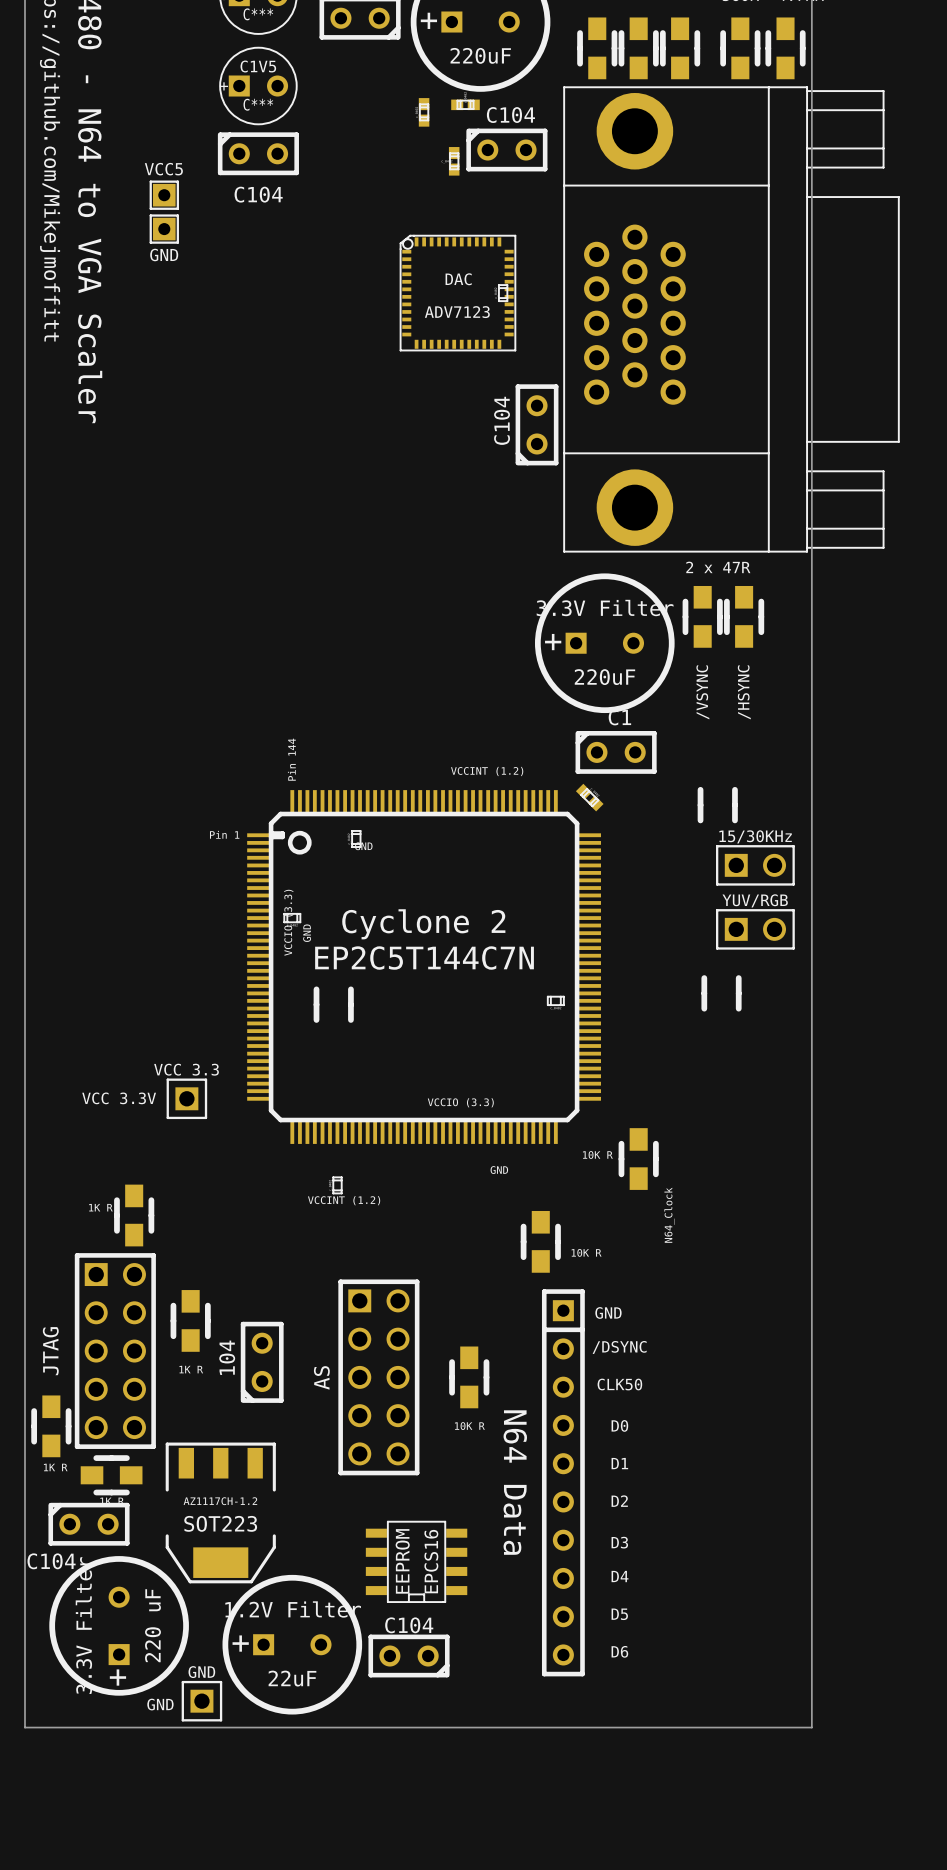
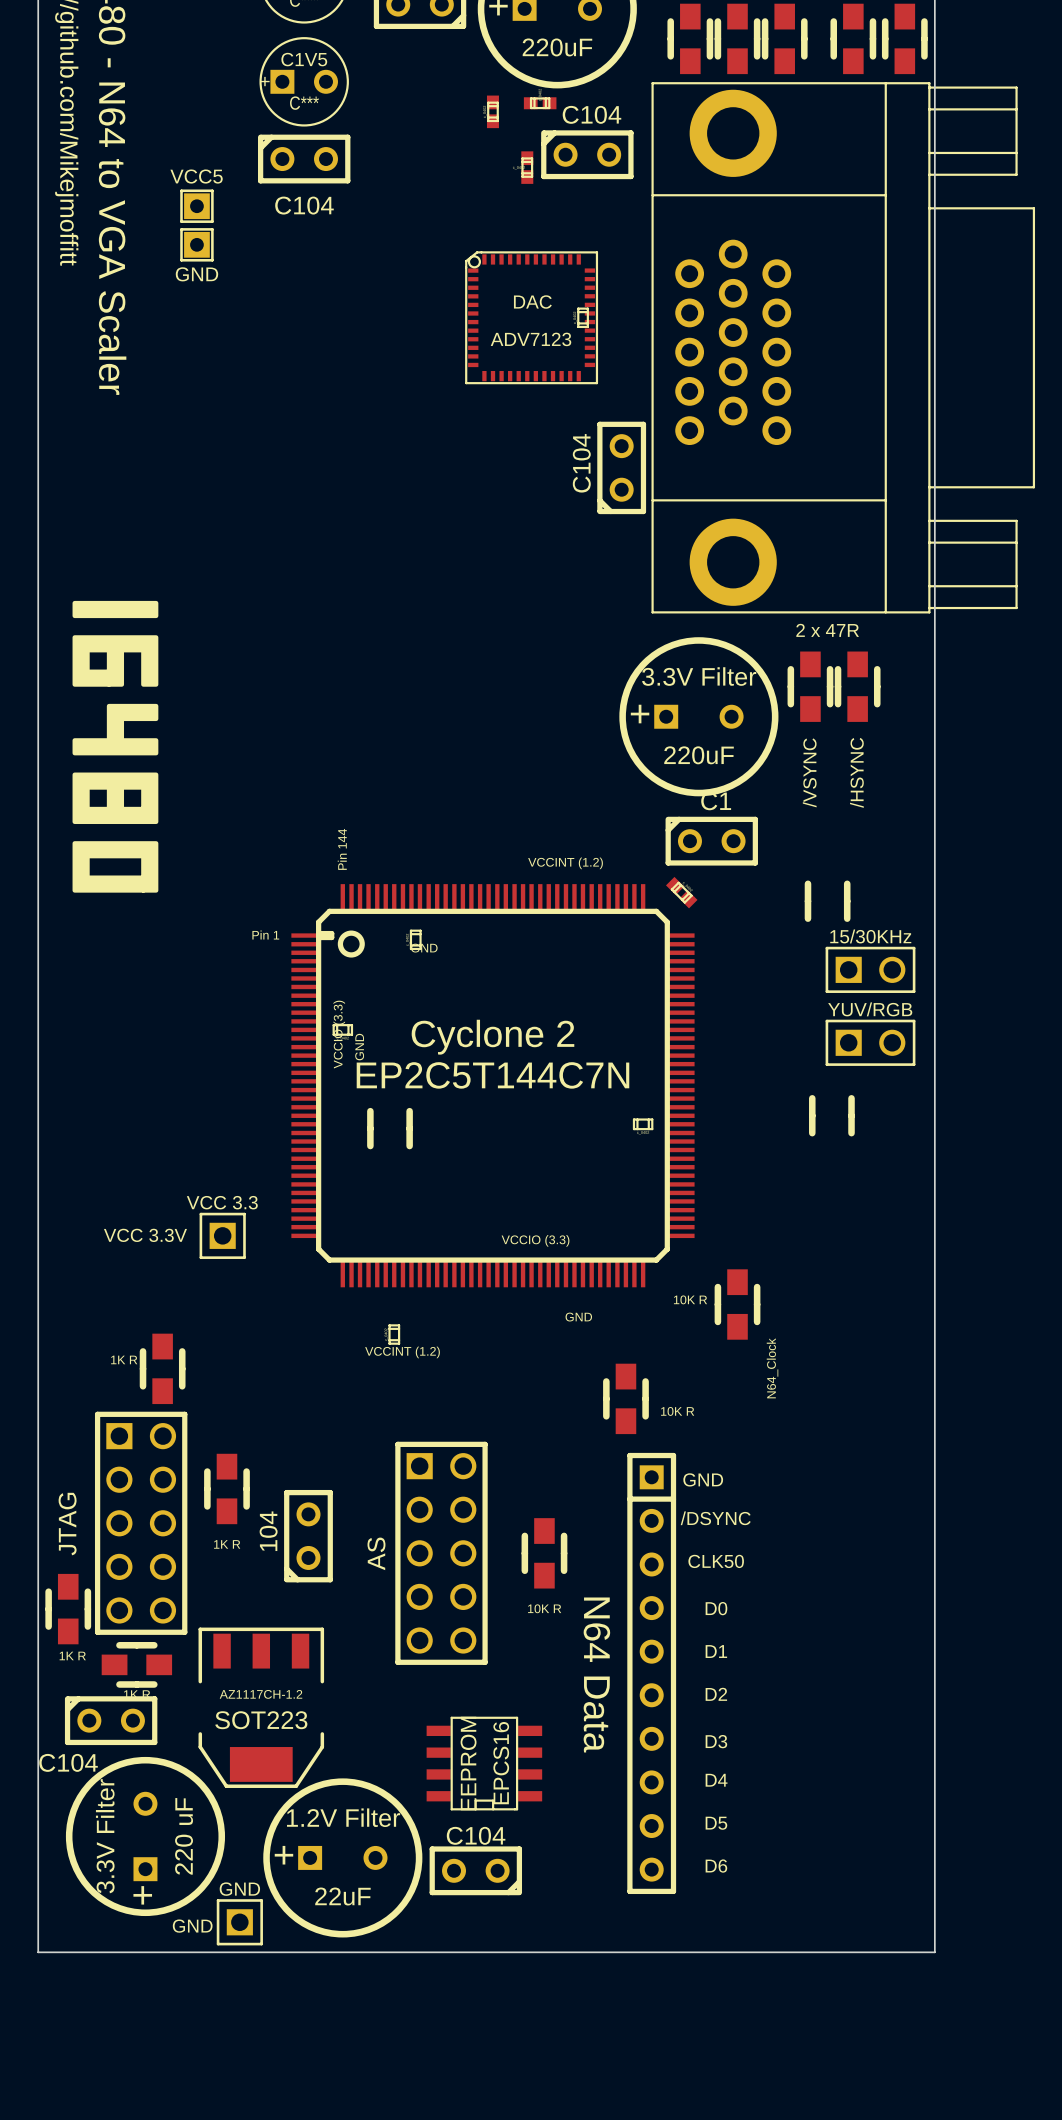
drawing: none -> [72, 600, 159, 893]

